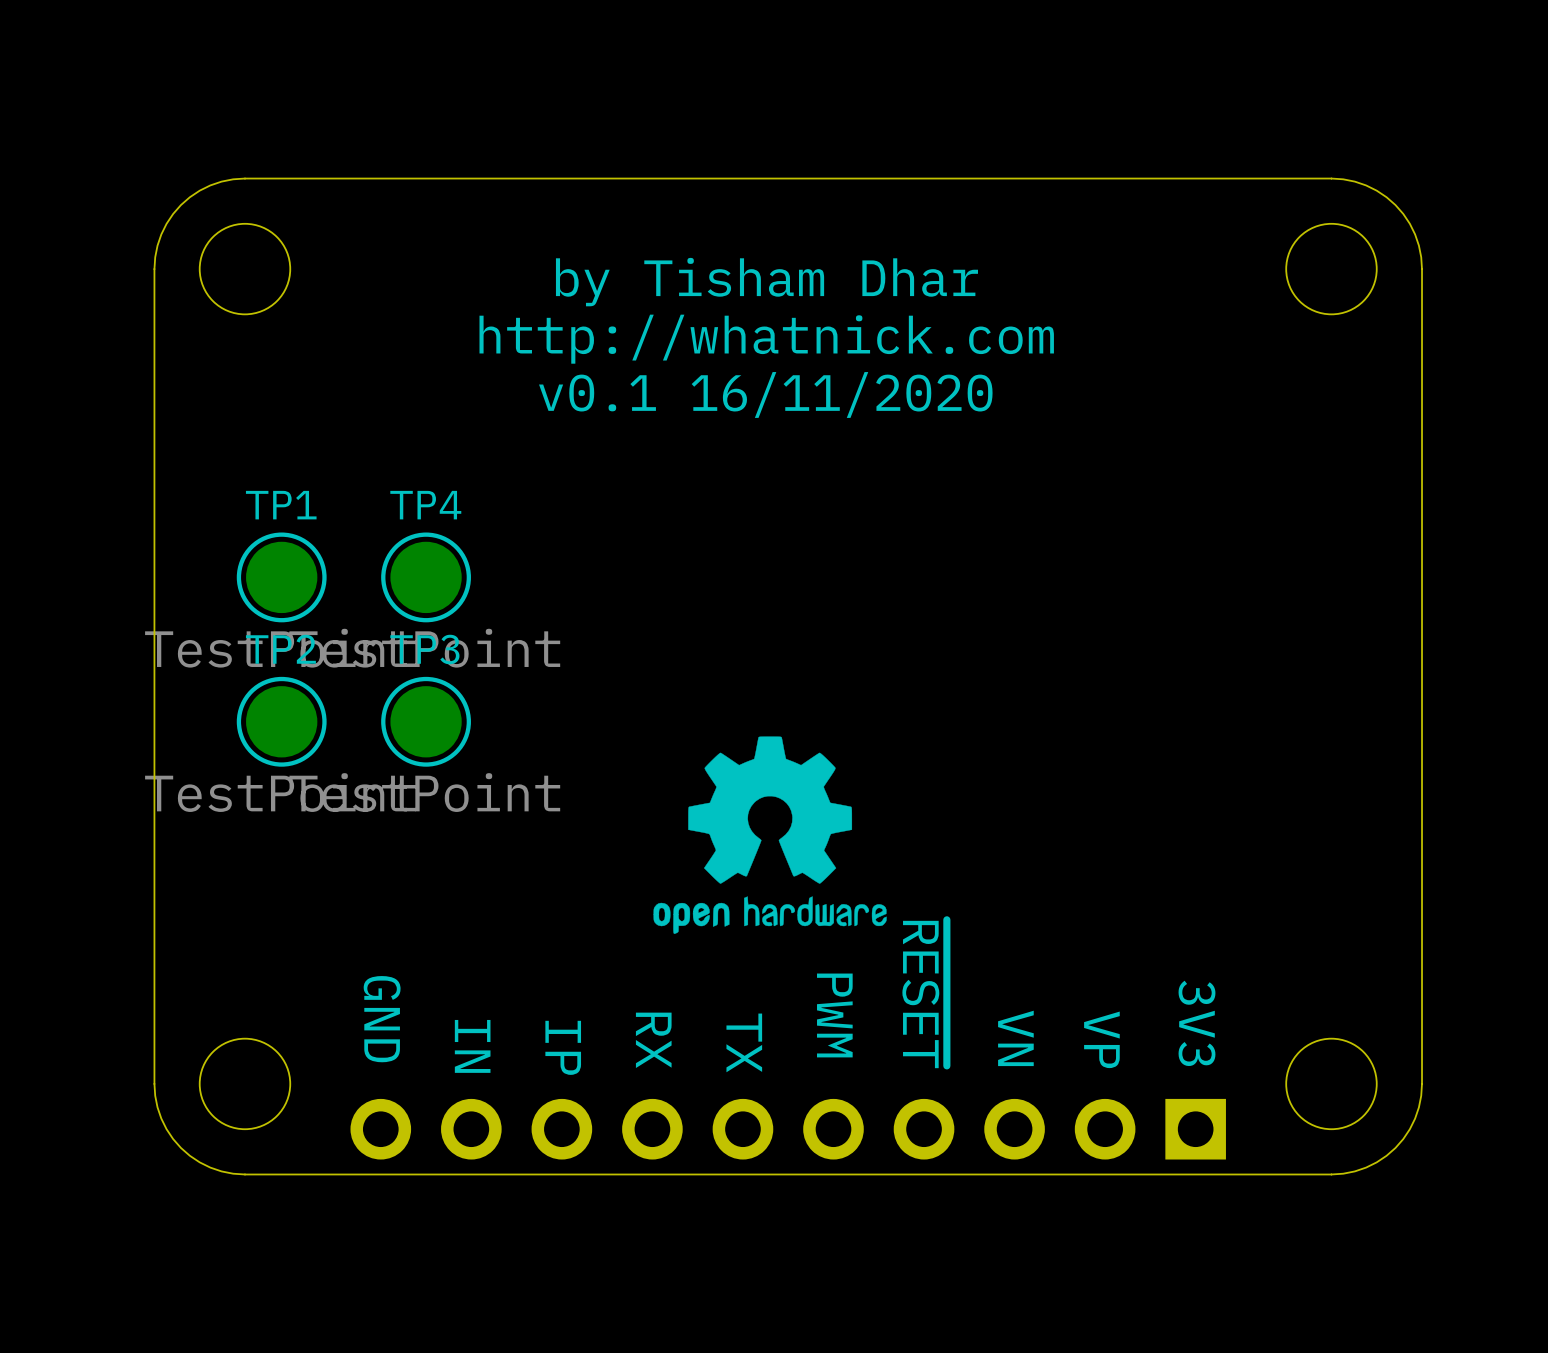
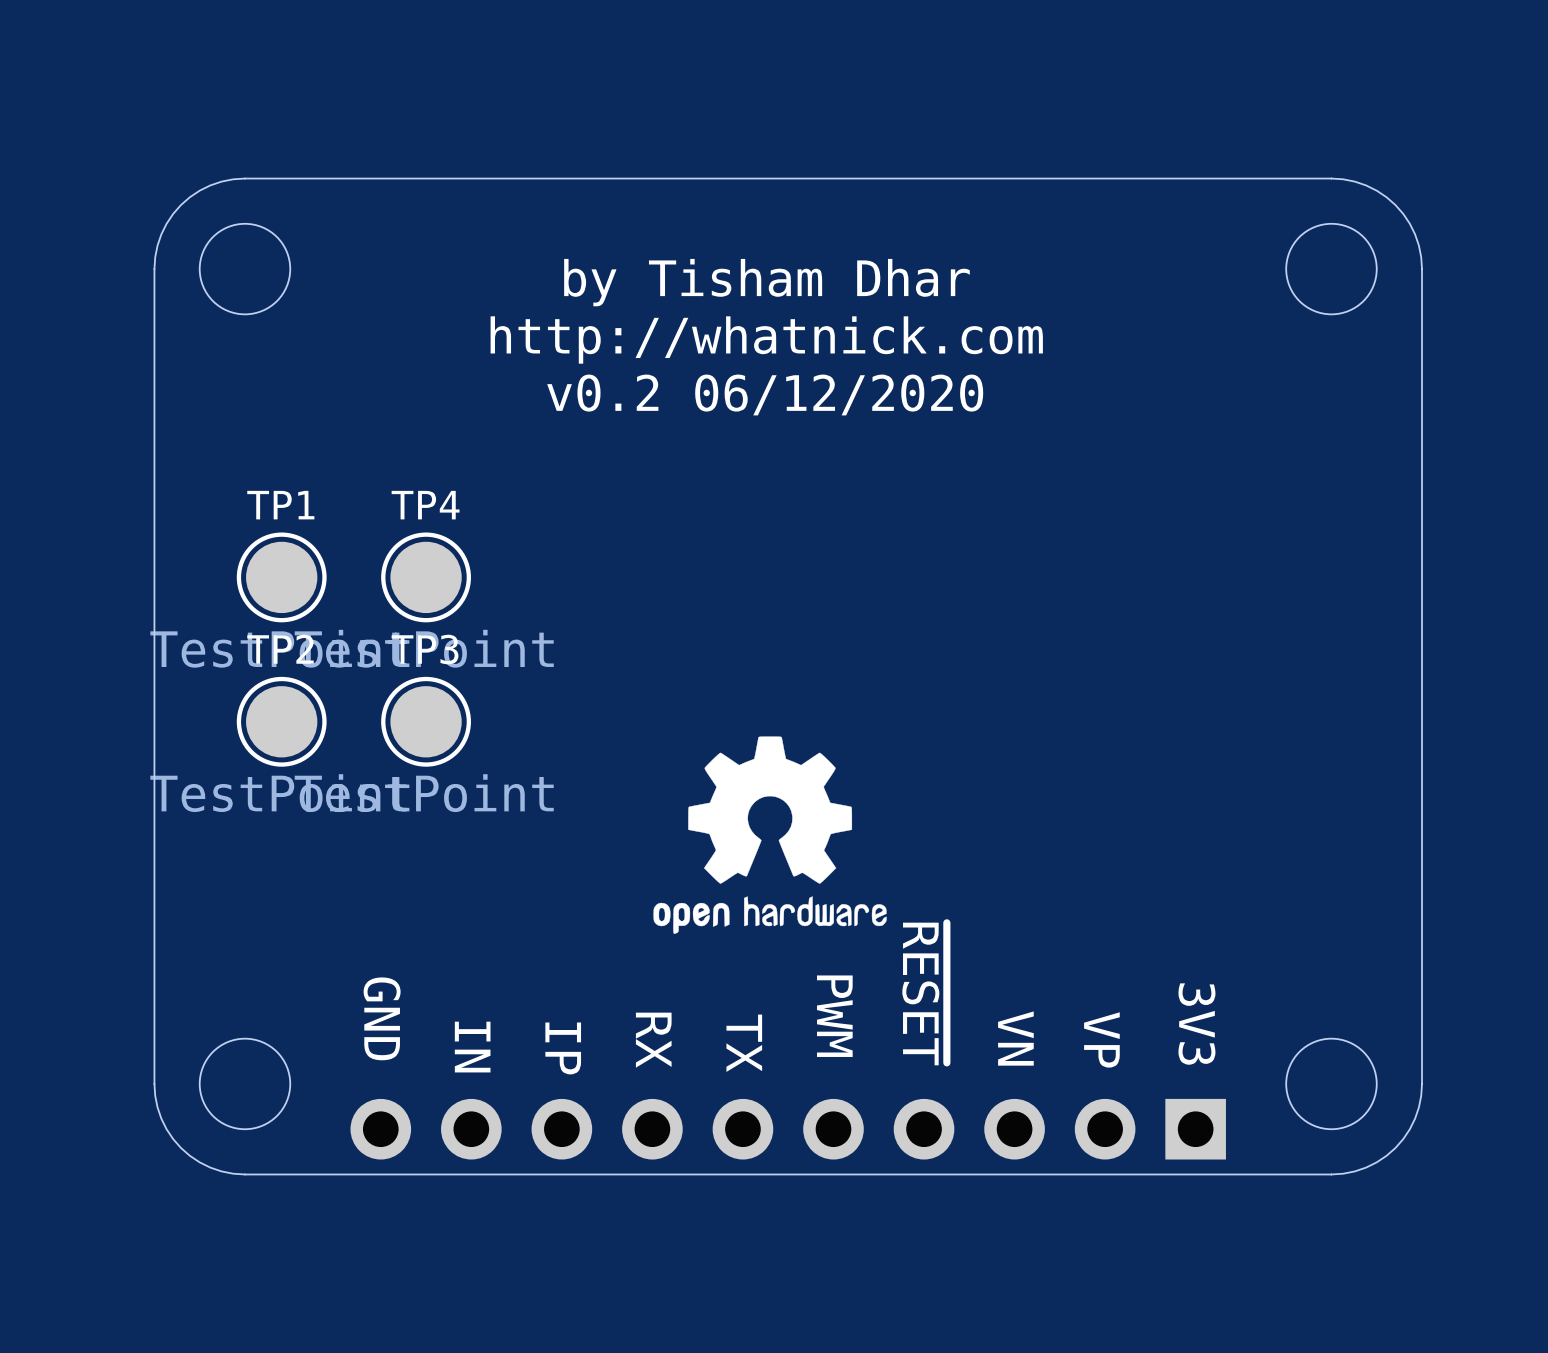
text: v0.1 16/11/2020 (765, 394) -> v0.2 06/12/2020 (765, 394)

